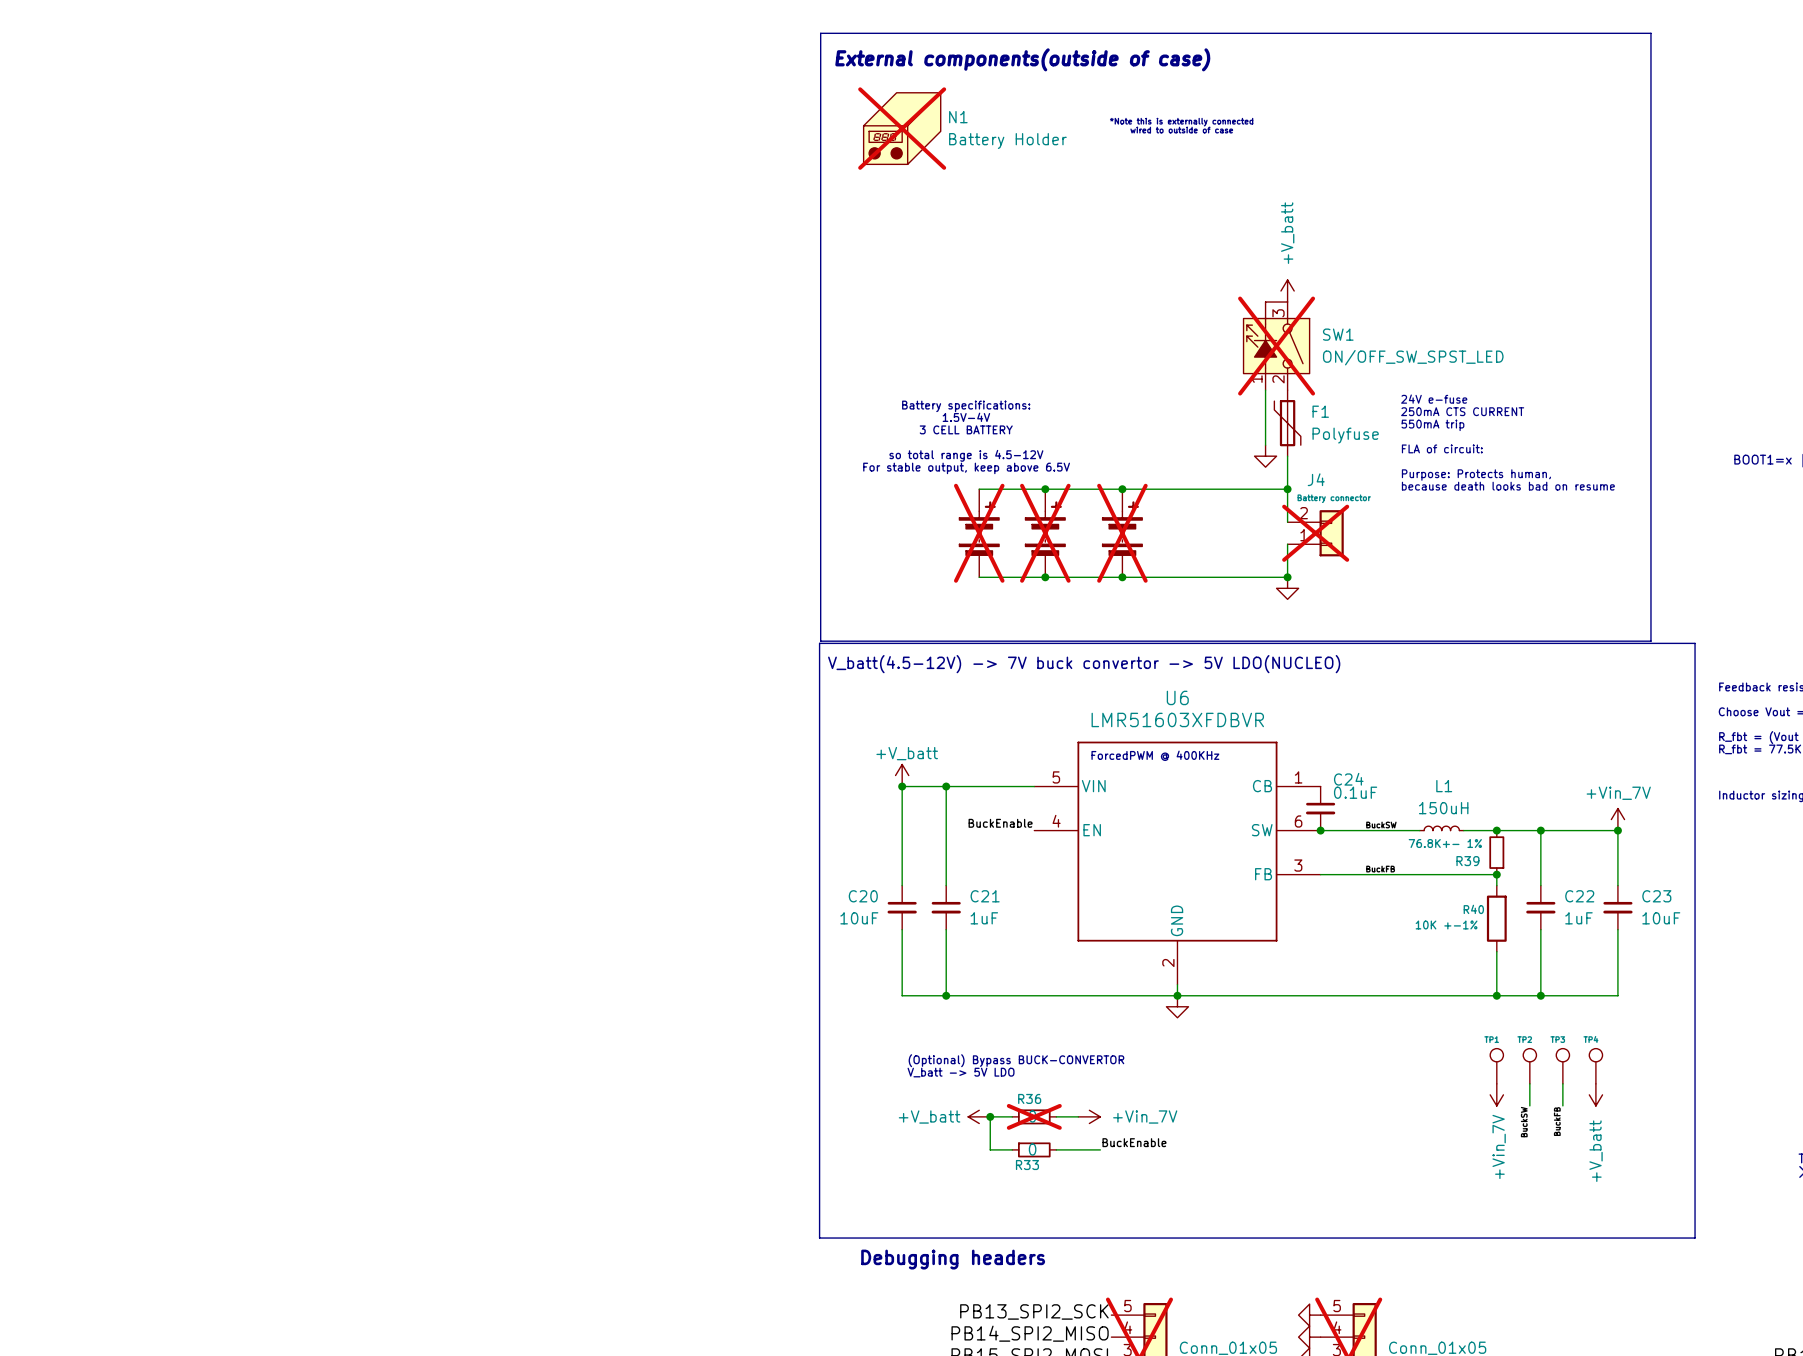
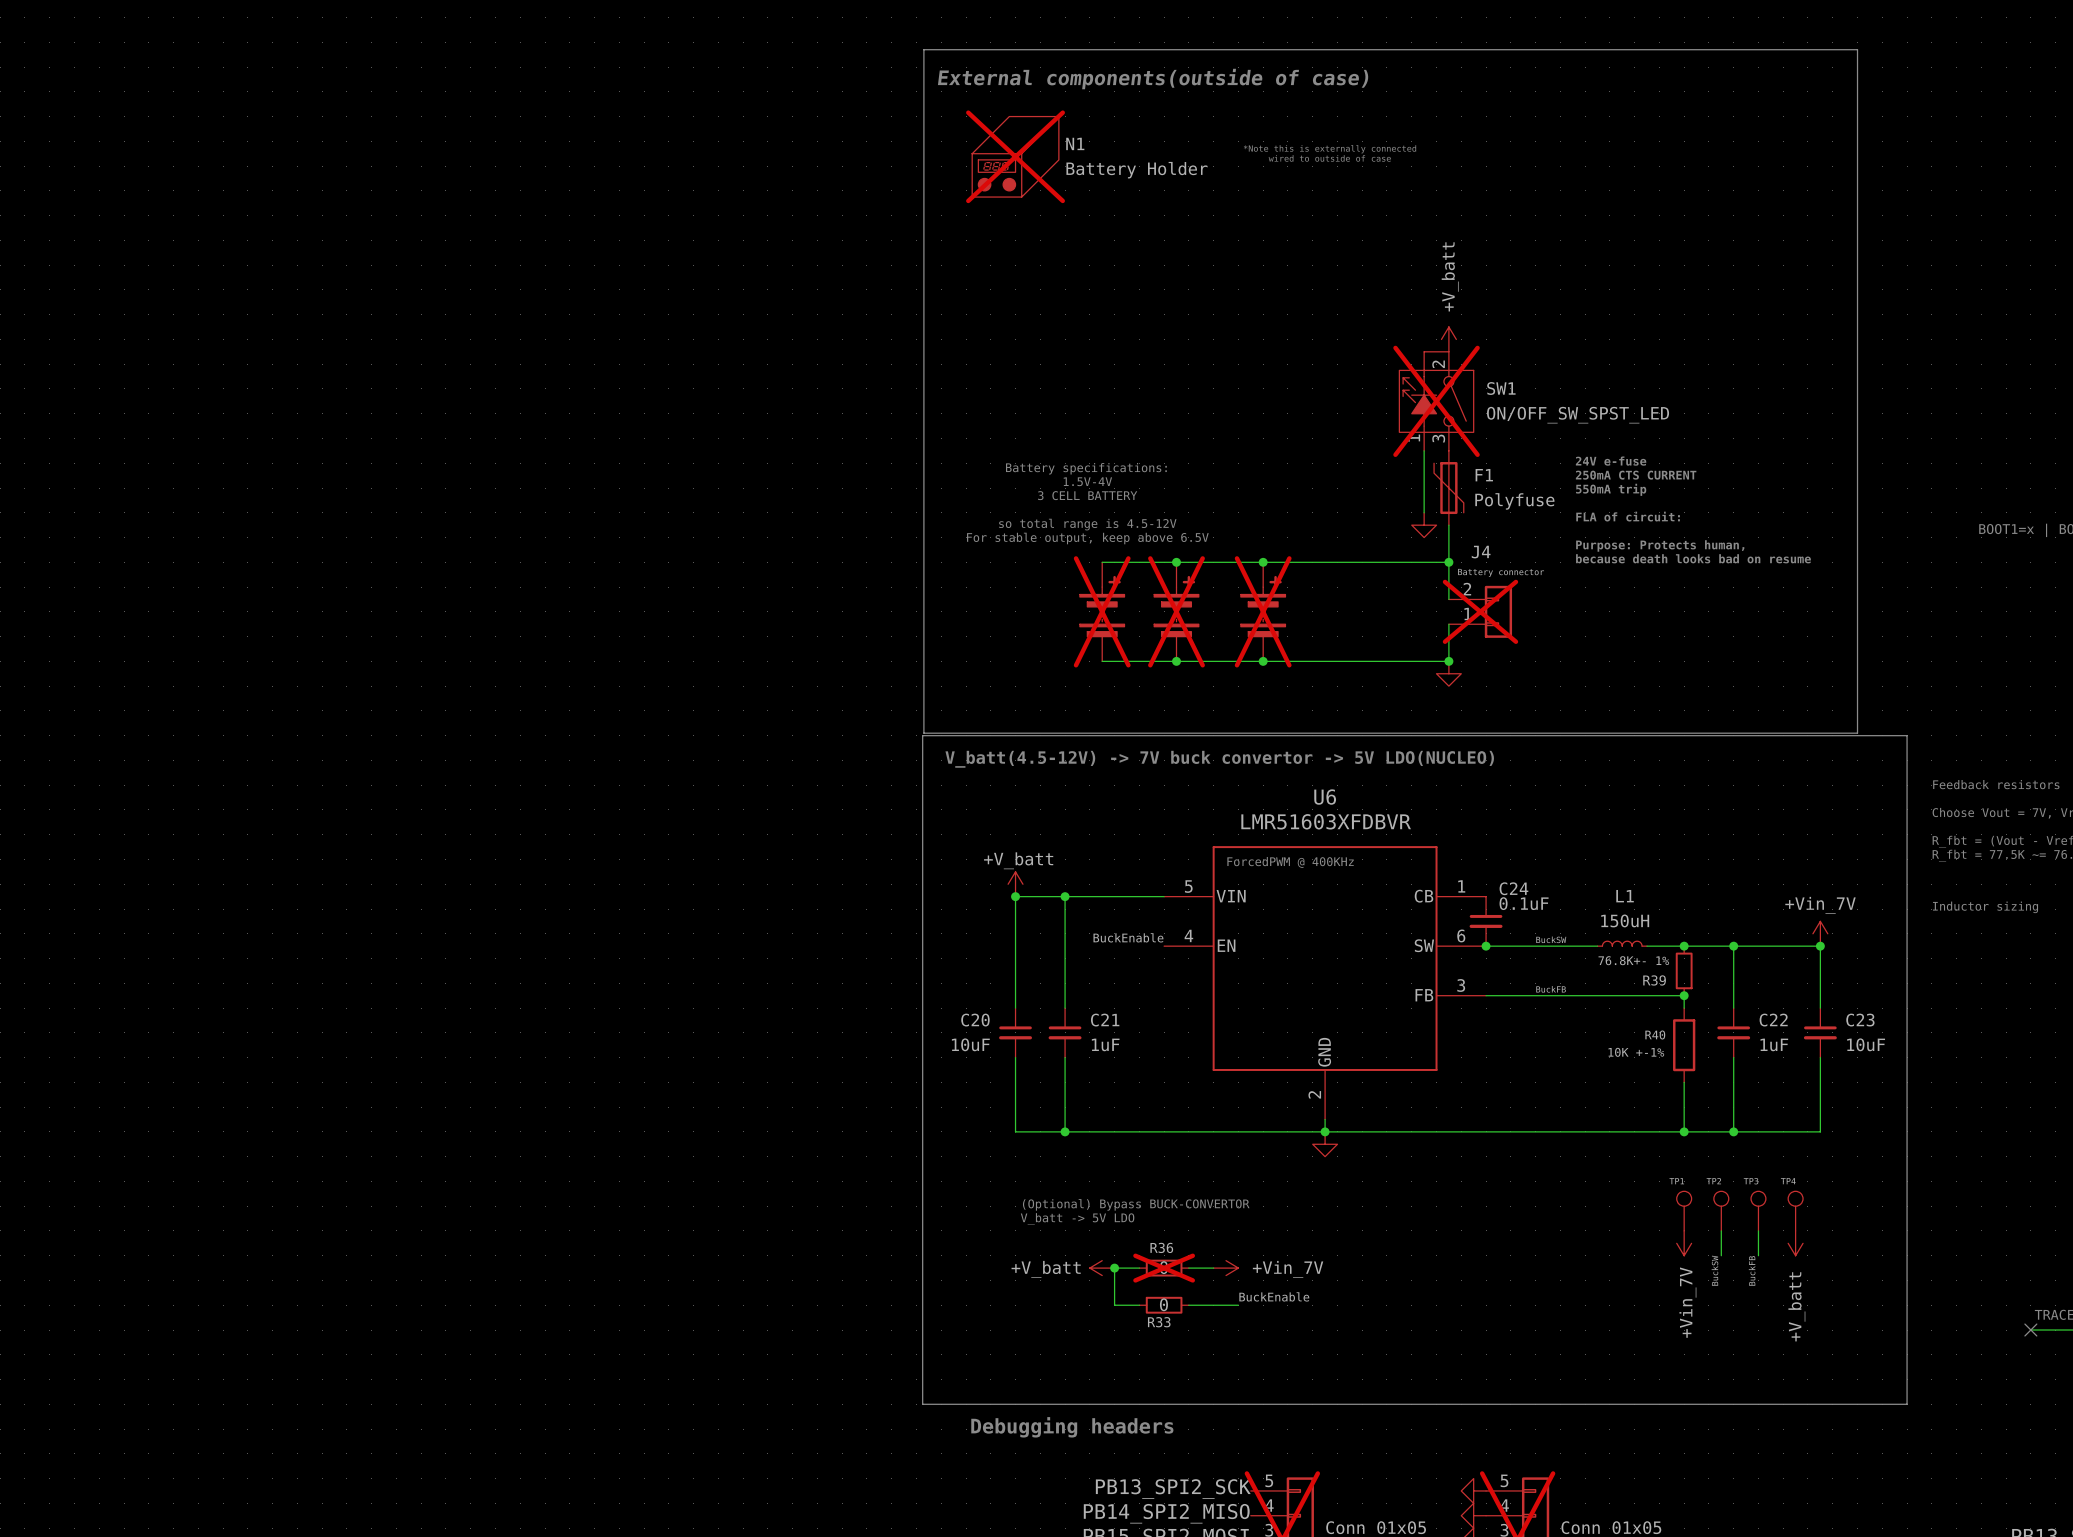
SW1 pin number: 3 (1278, 313) -> 2 (1438, 364)
SW1 pin number: 2 (1278, 379) -> 3 (1438, 438)

